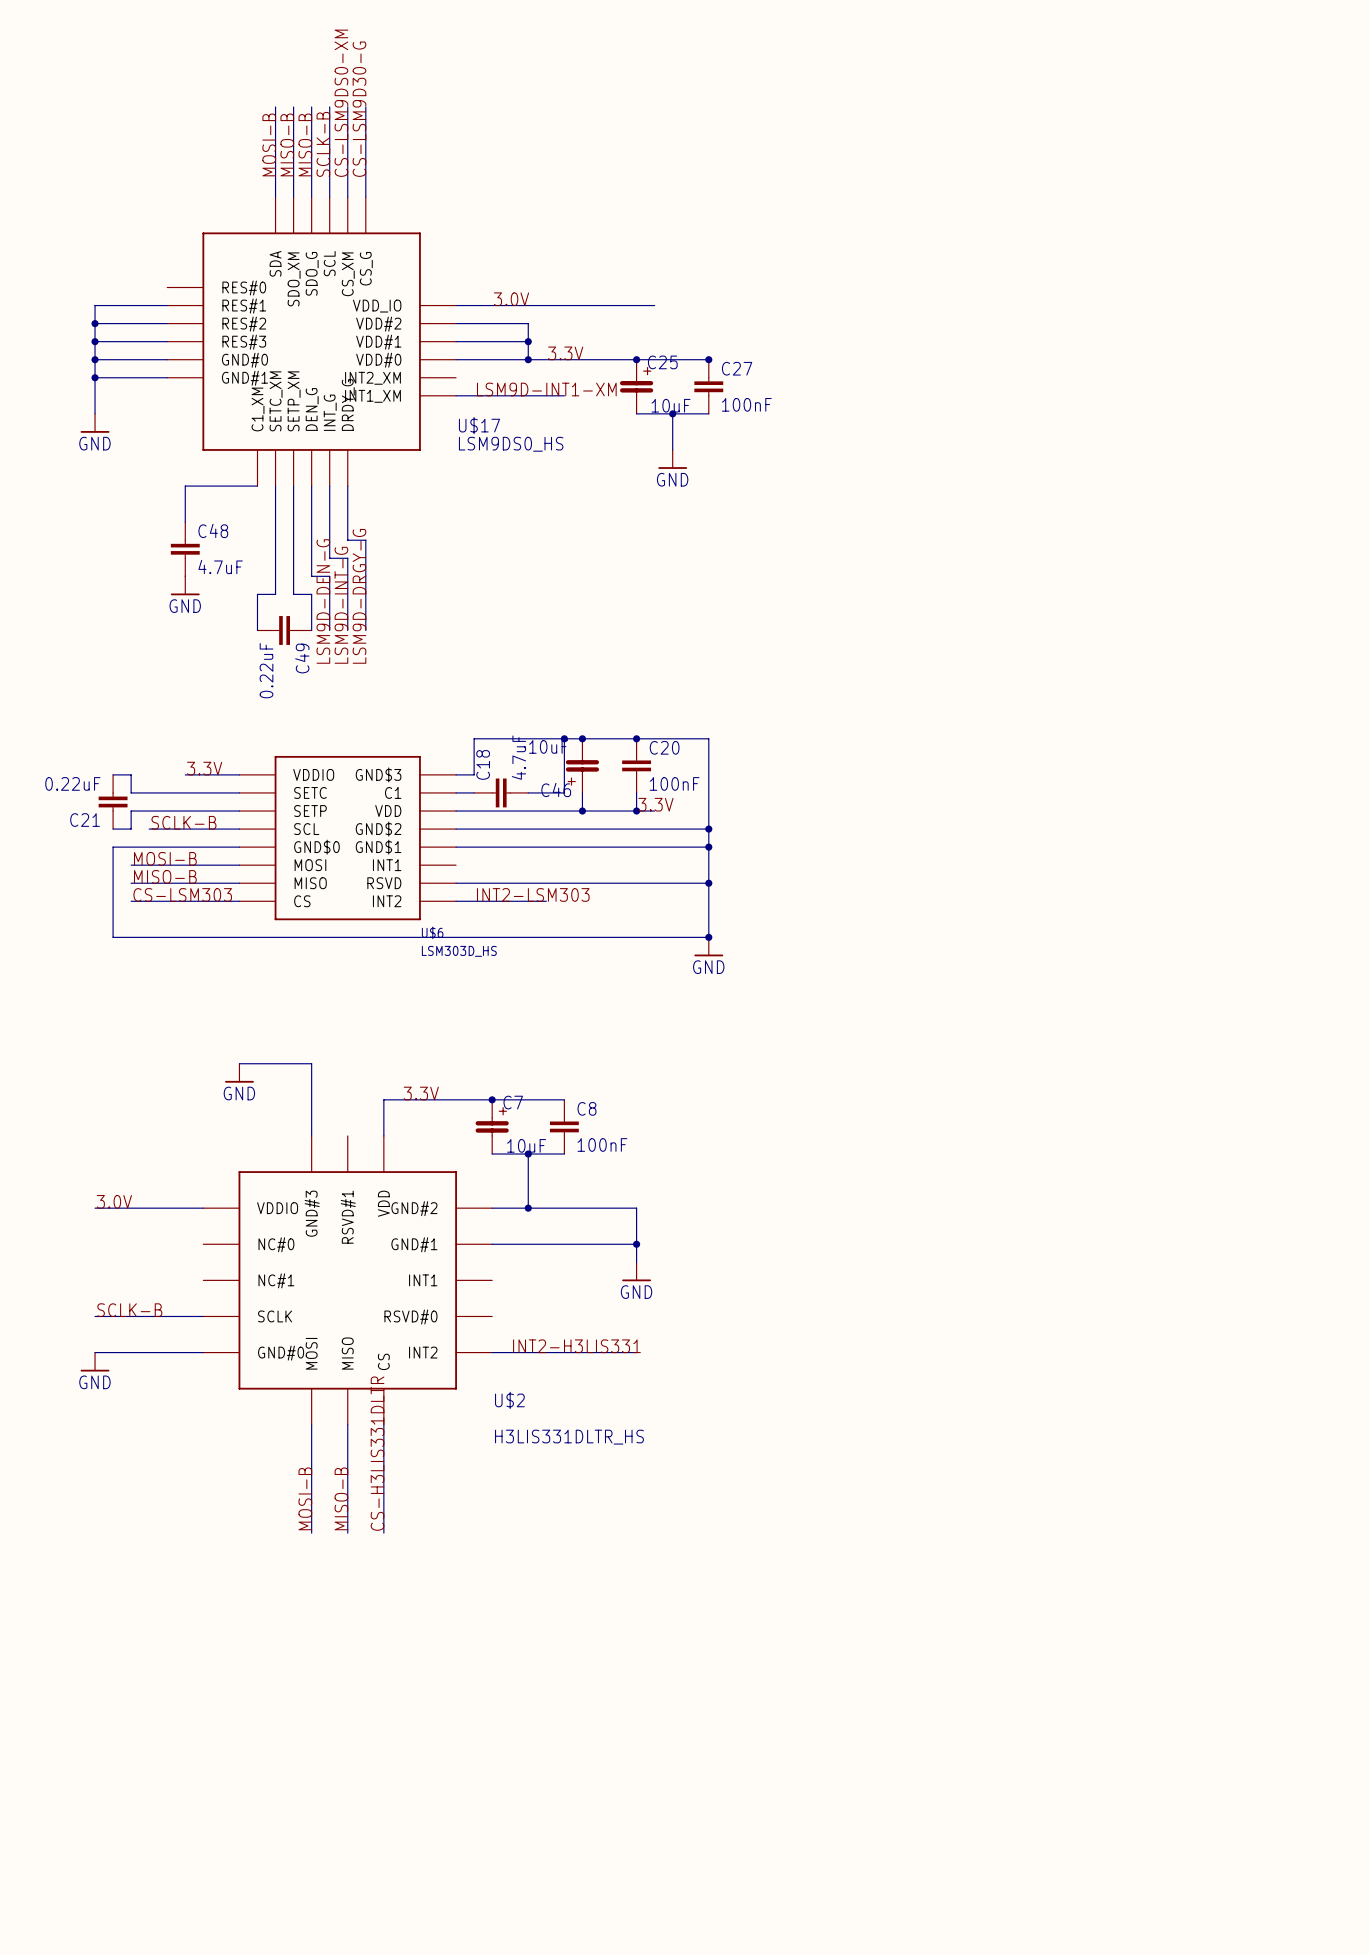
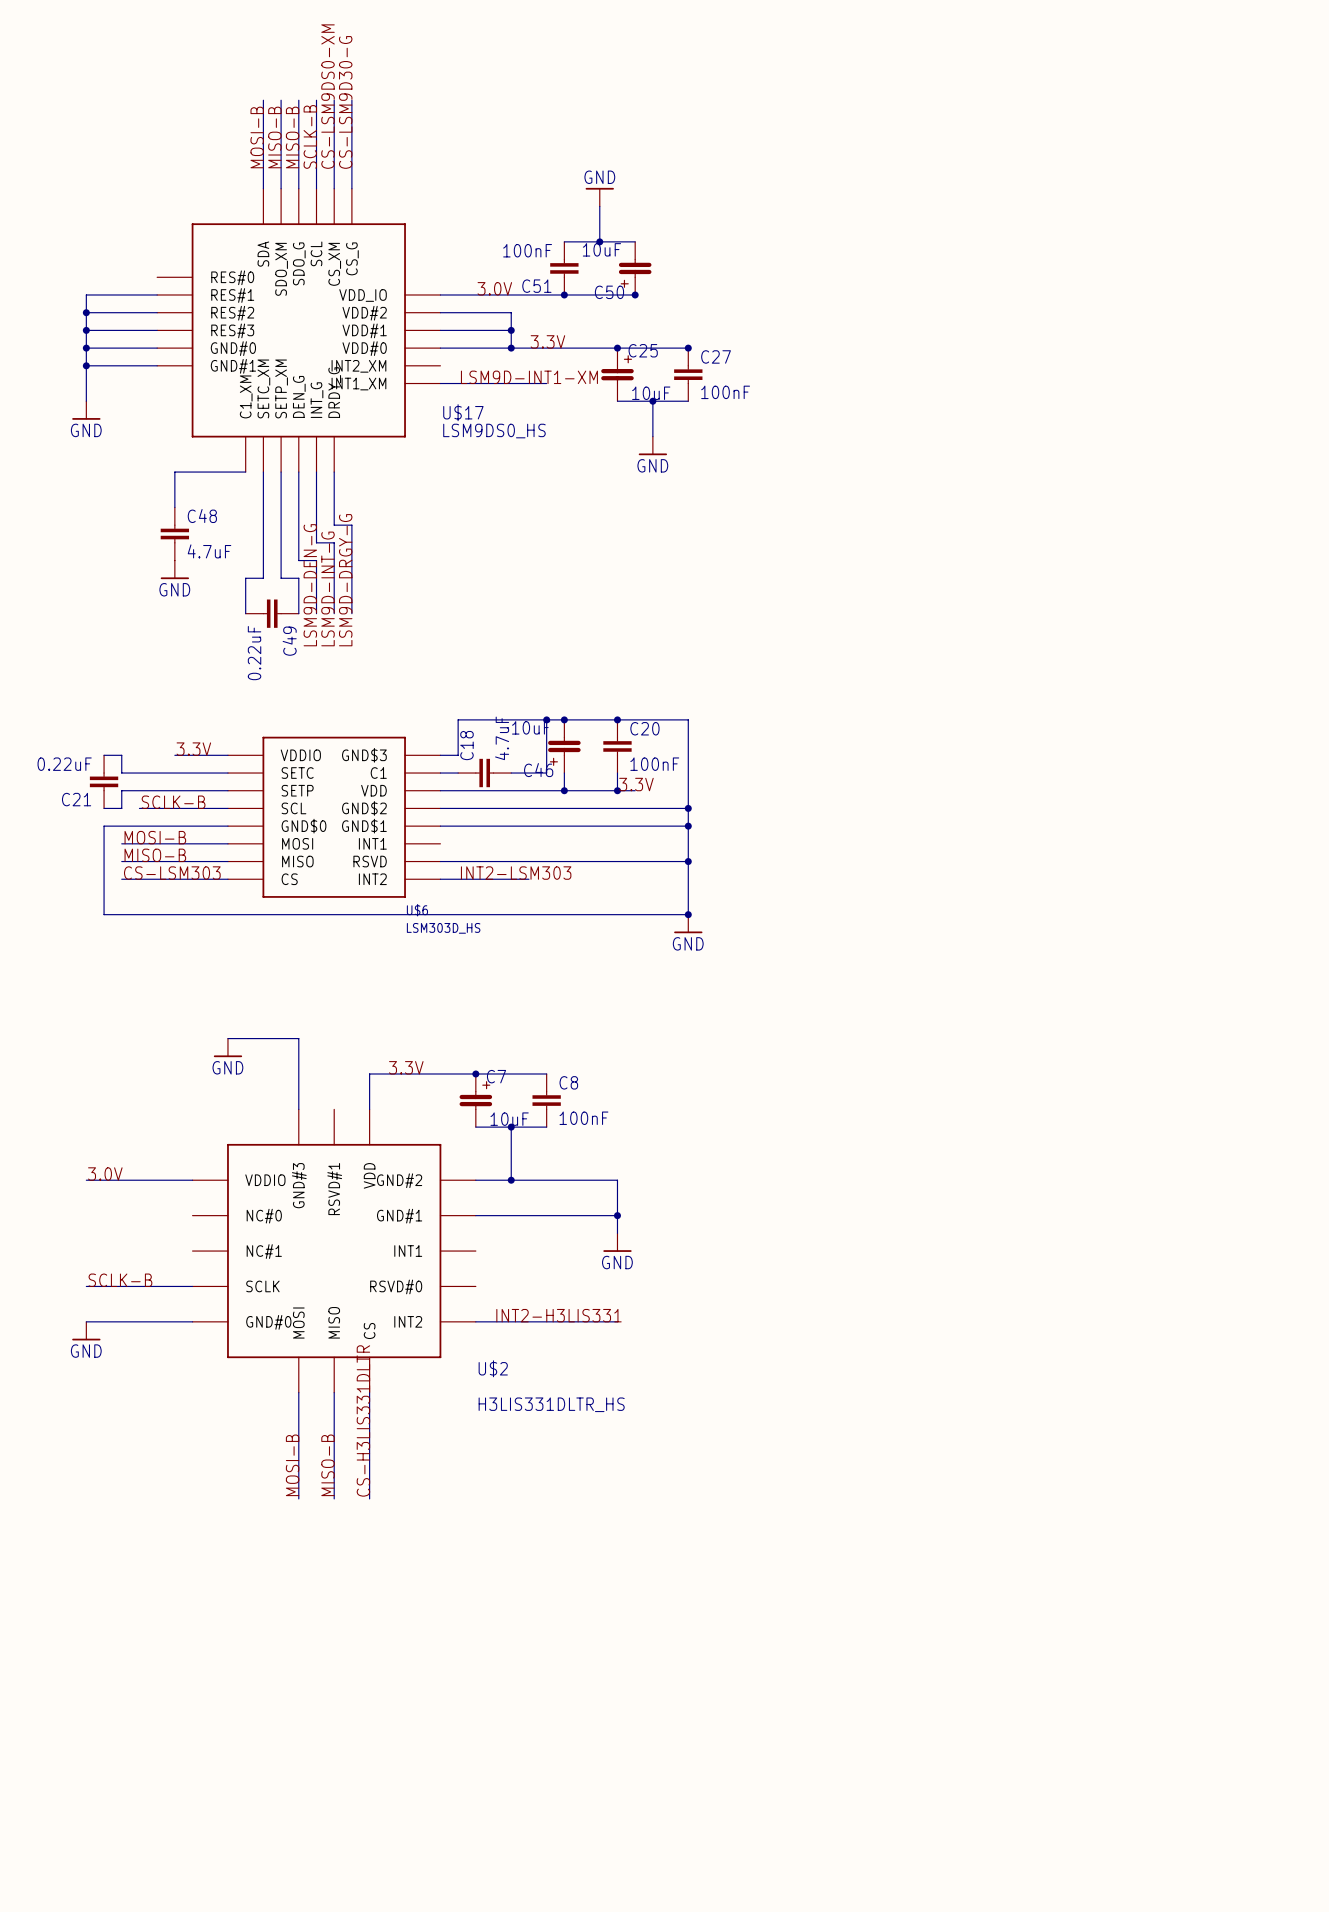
power symbol: none -> GND (599, 197)
wire: none -> (599, 206) (599, 241)
wire: none -> (564, 241) (635, 241)
junction: none -> (599, 241)
C51: none -> 100nF (564, 268)
C50: none -> 10uF (635, 268)
junction: none -> (564, 294)
junction: none -> (635, 294)

